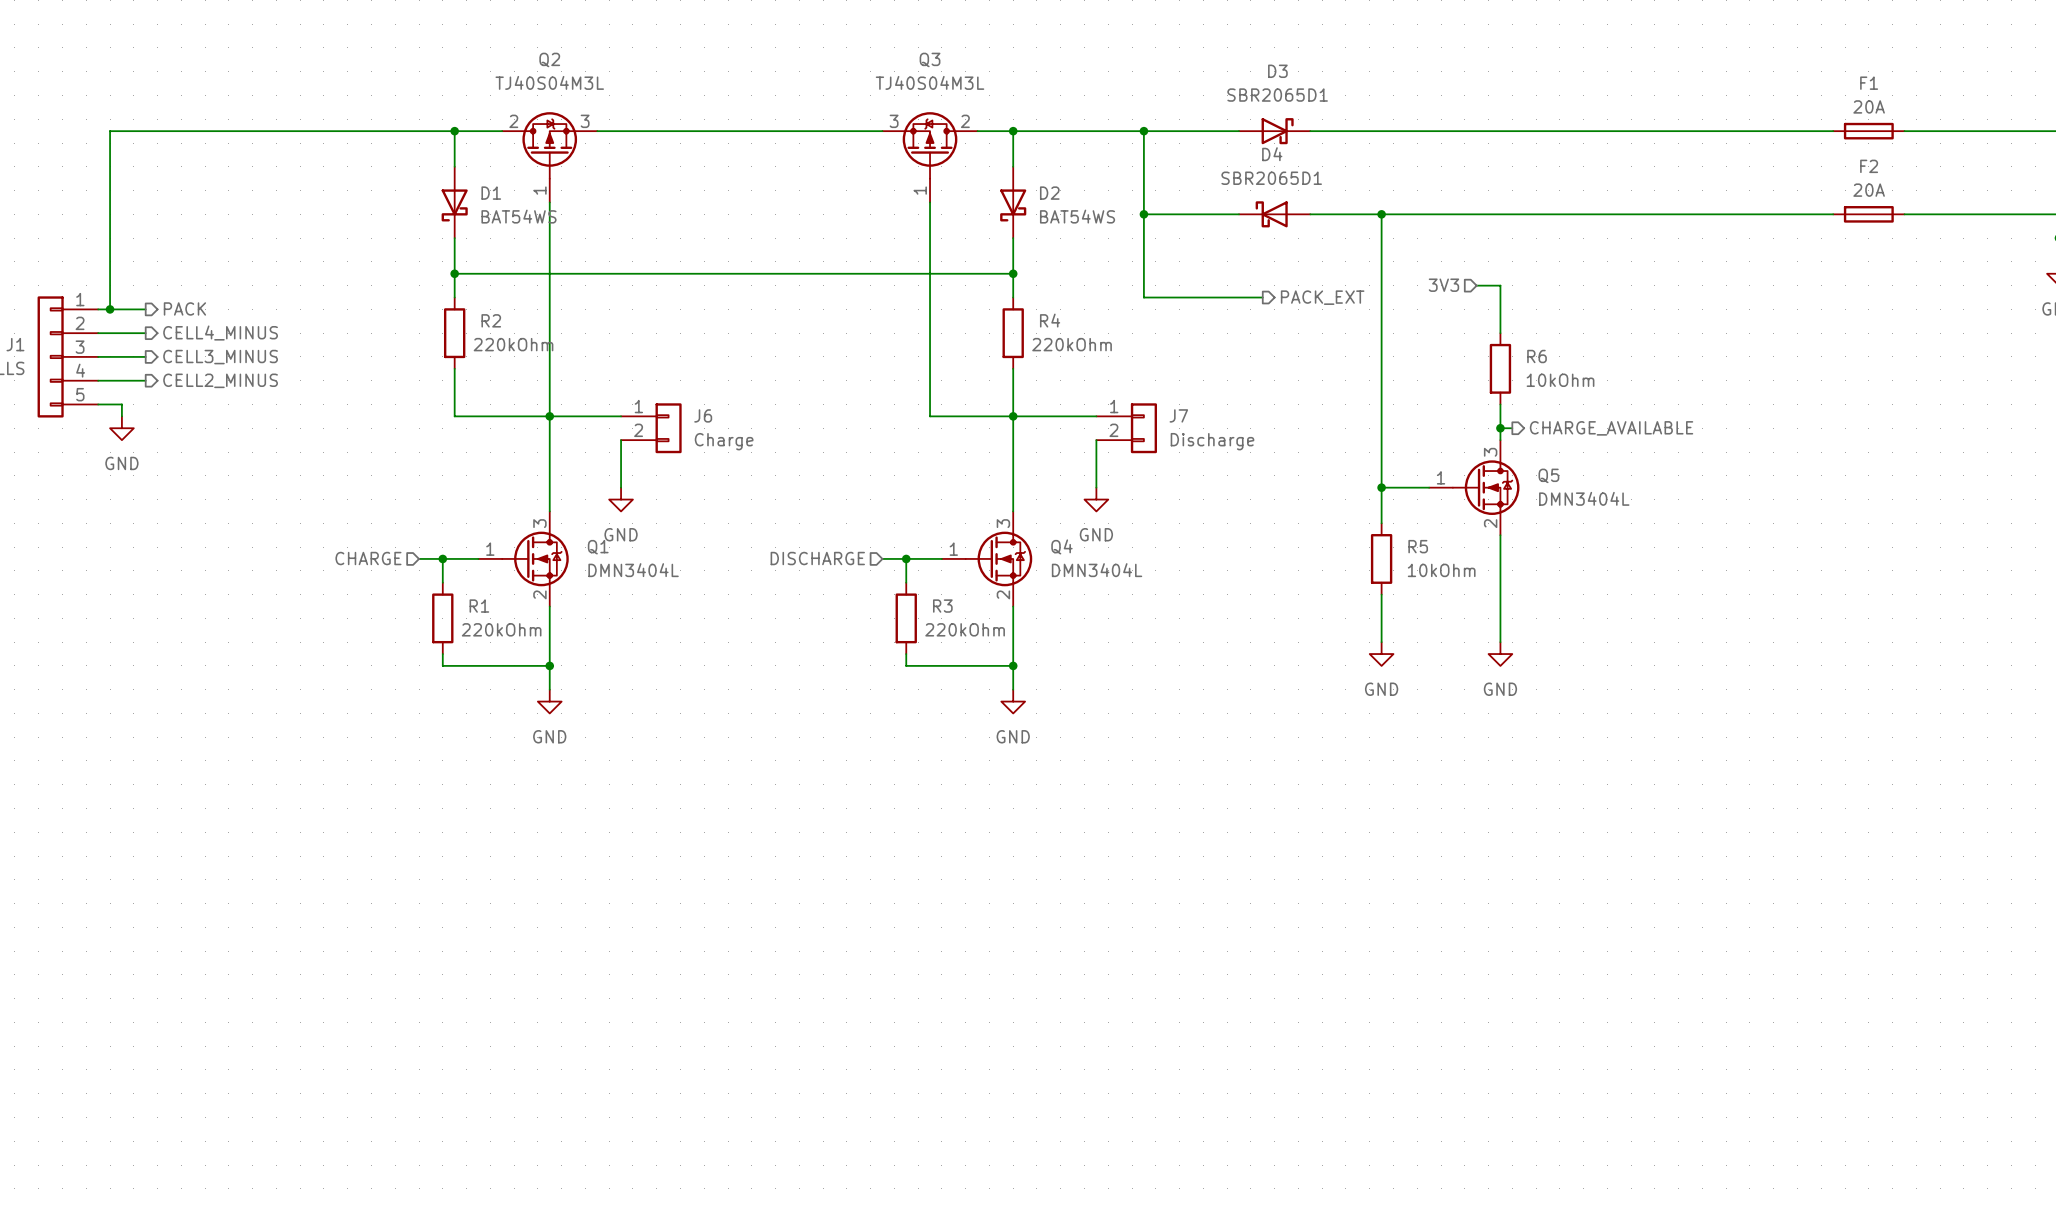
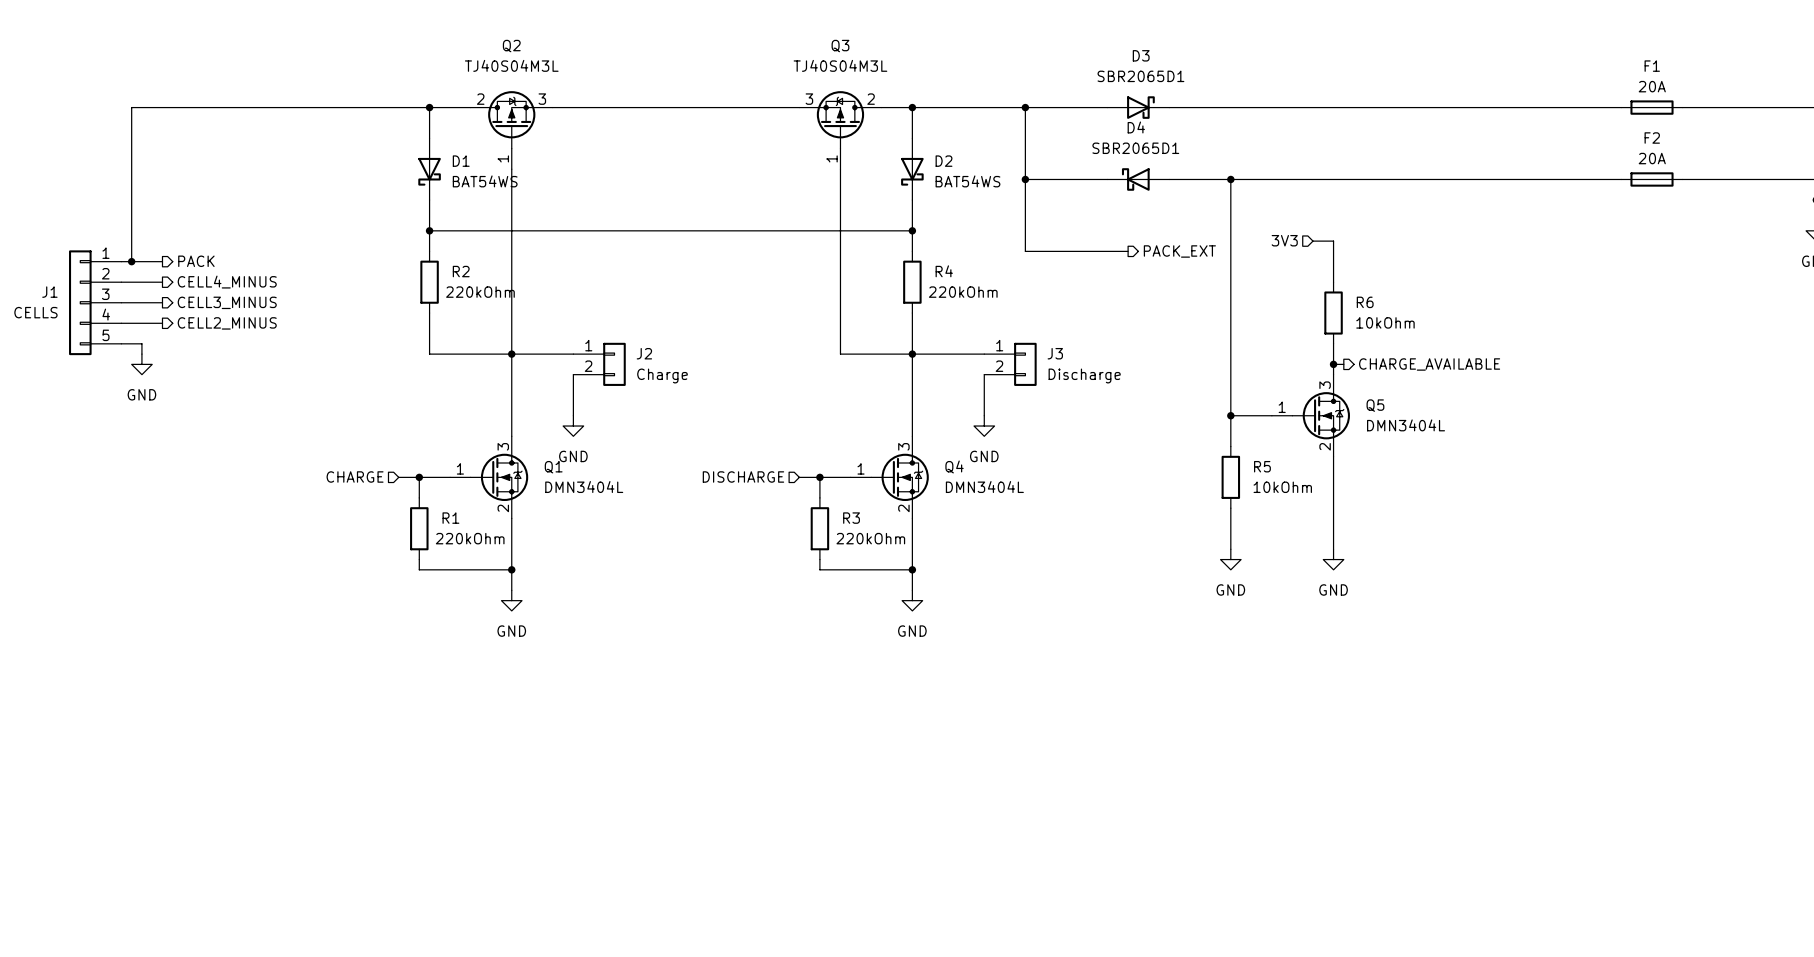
J6 name: J6 (703, 415) -> J2 (644, 353)
J7 name: J7 (1178, 415) -> J3 (1055, 353)

